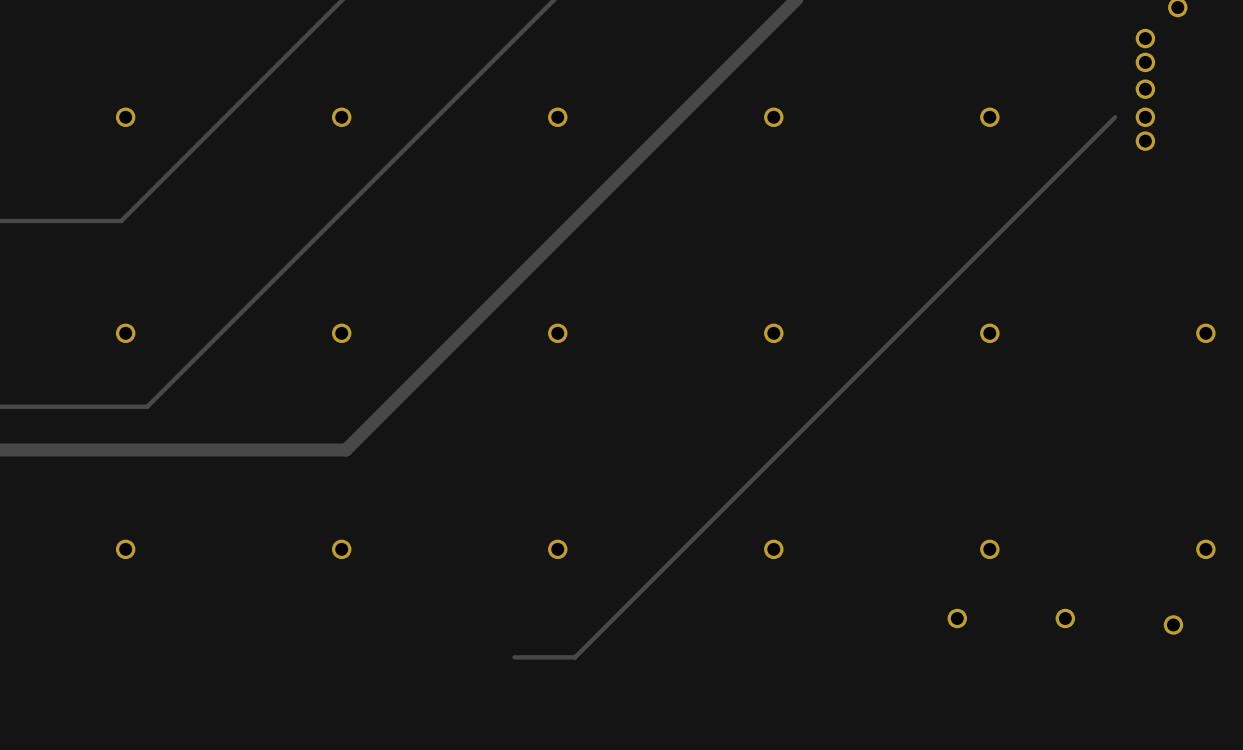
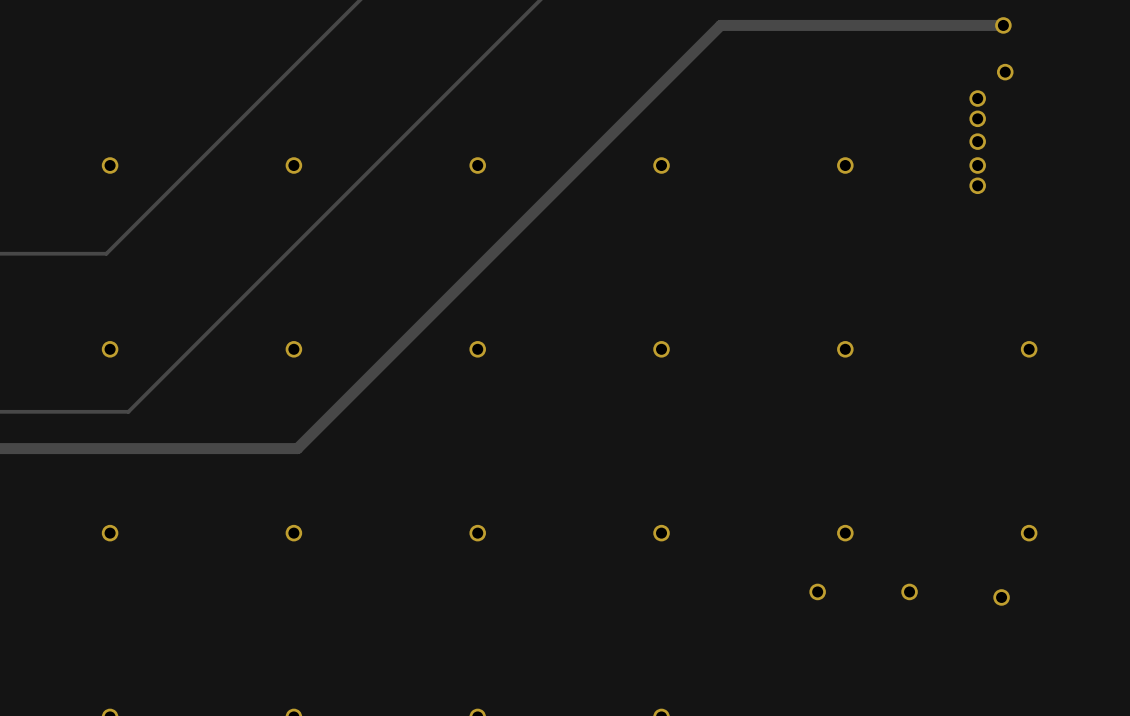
track: (1115, 117) (575, 657) (514, 657) -> none

